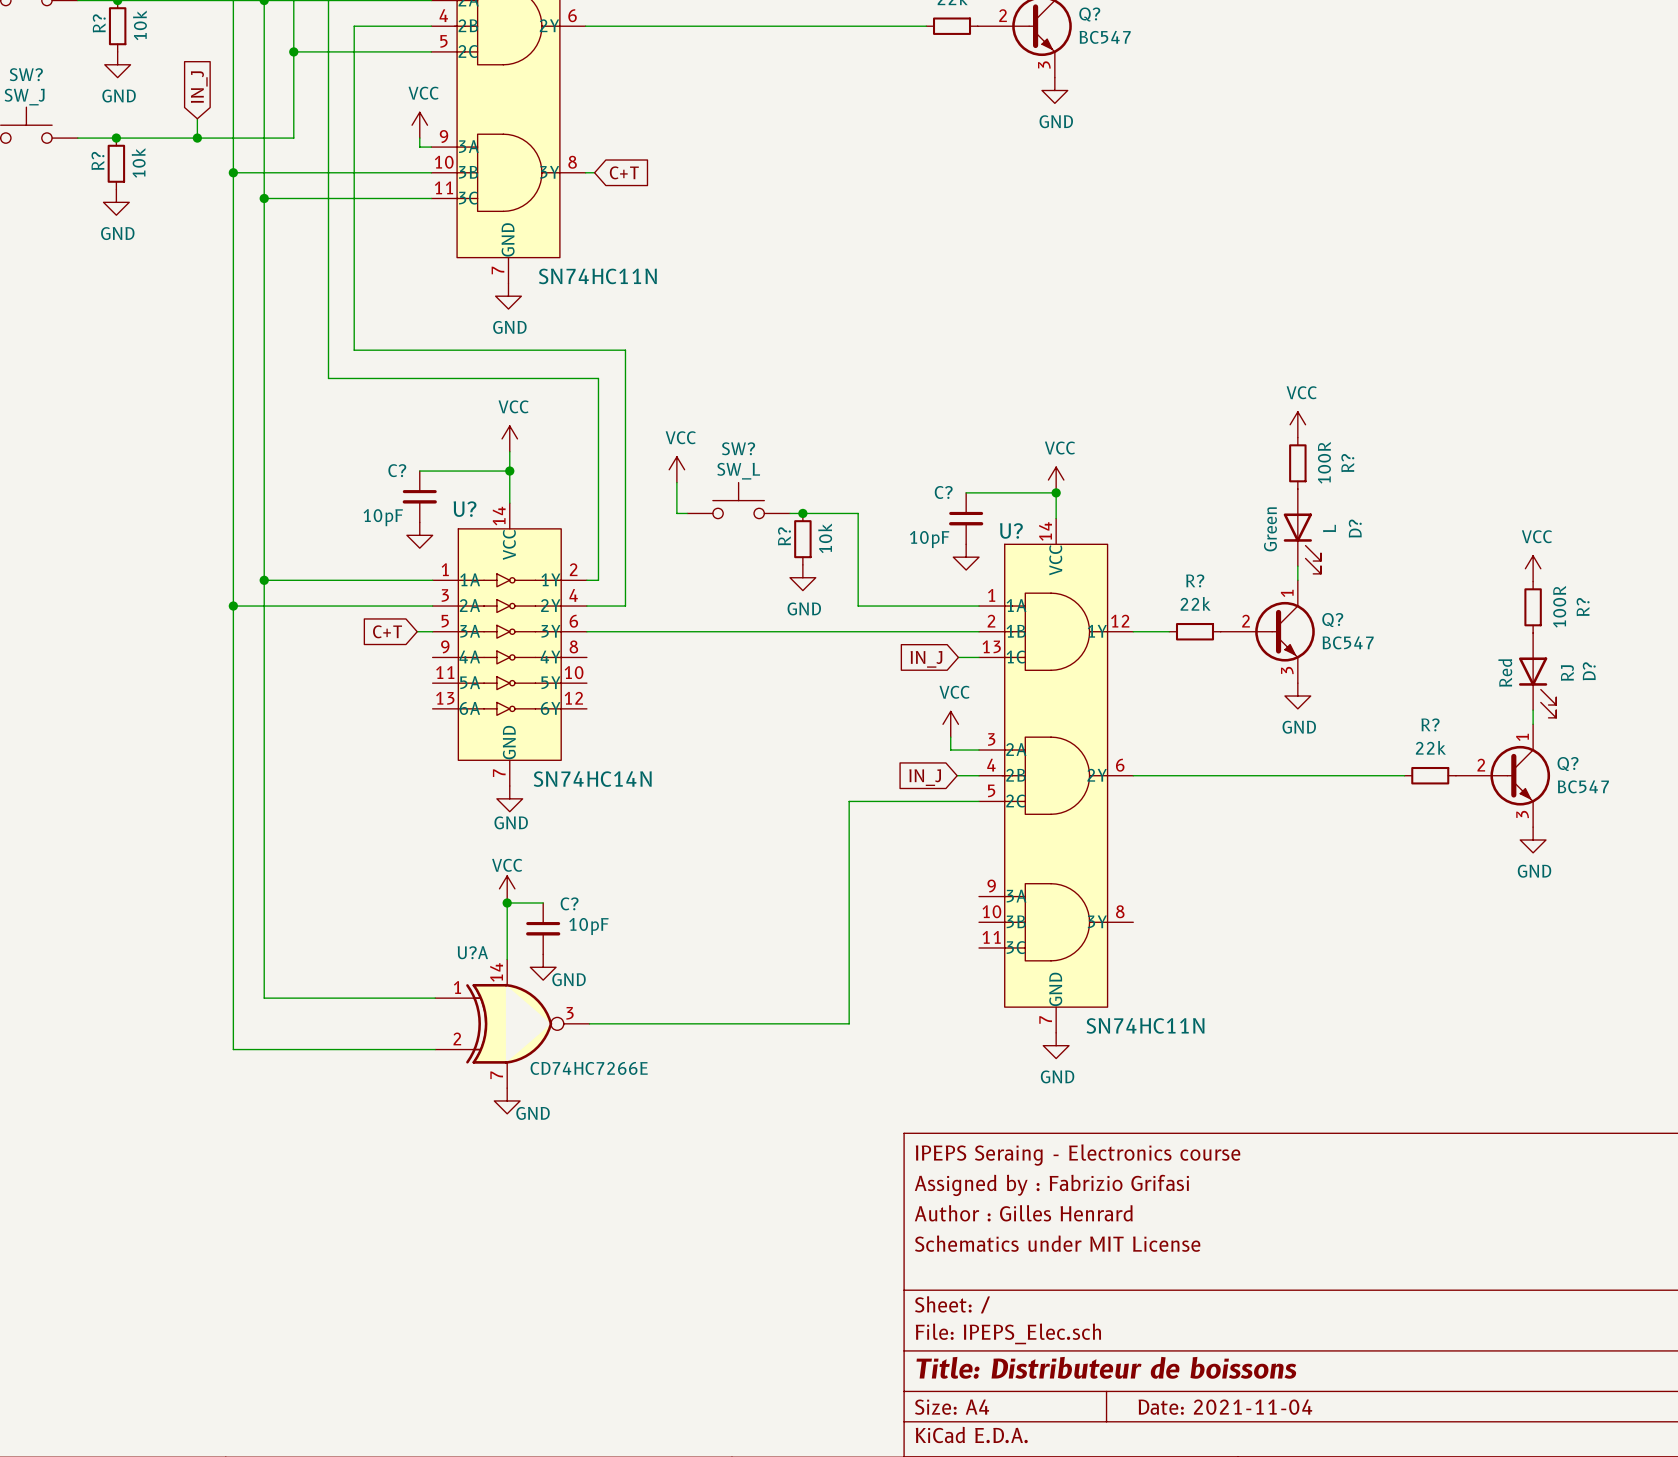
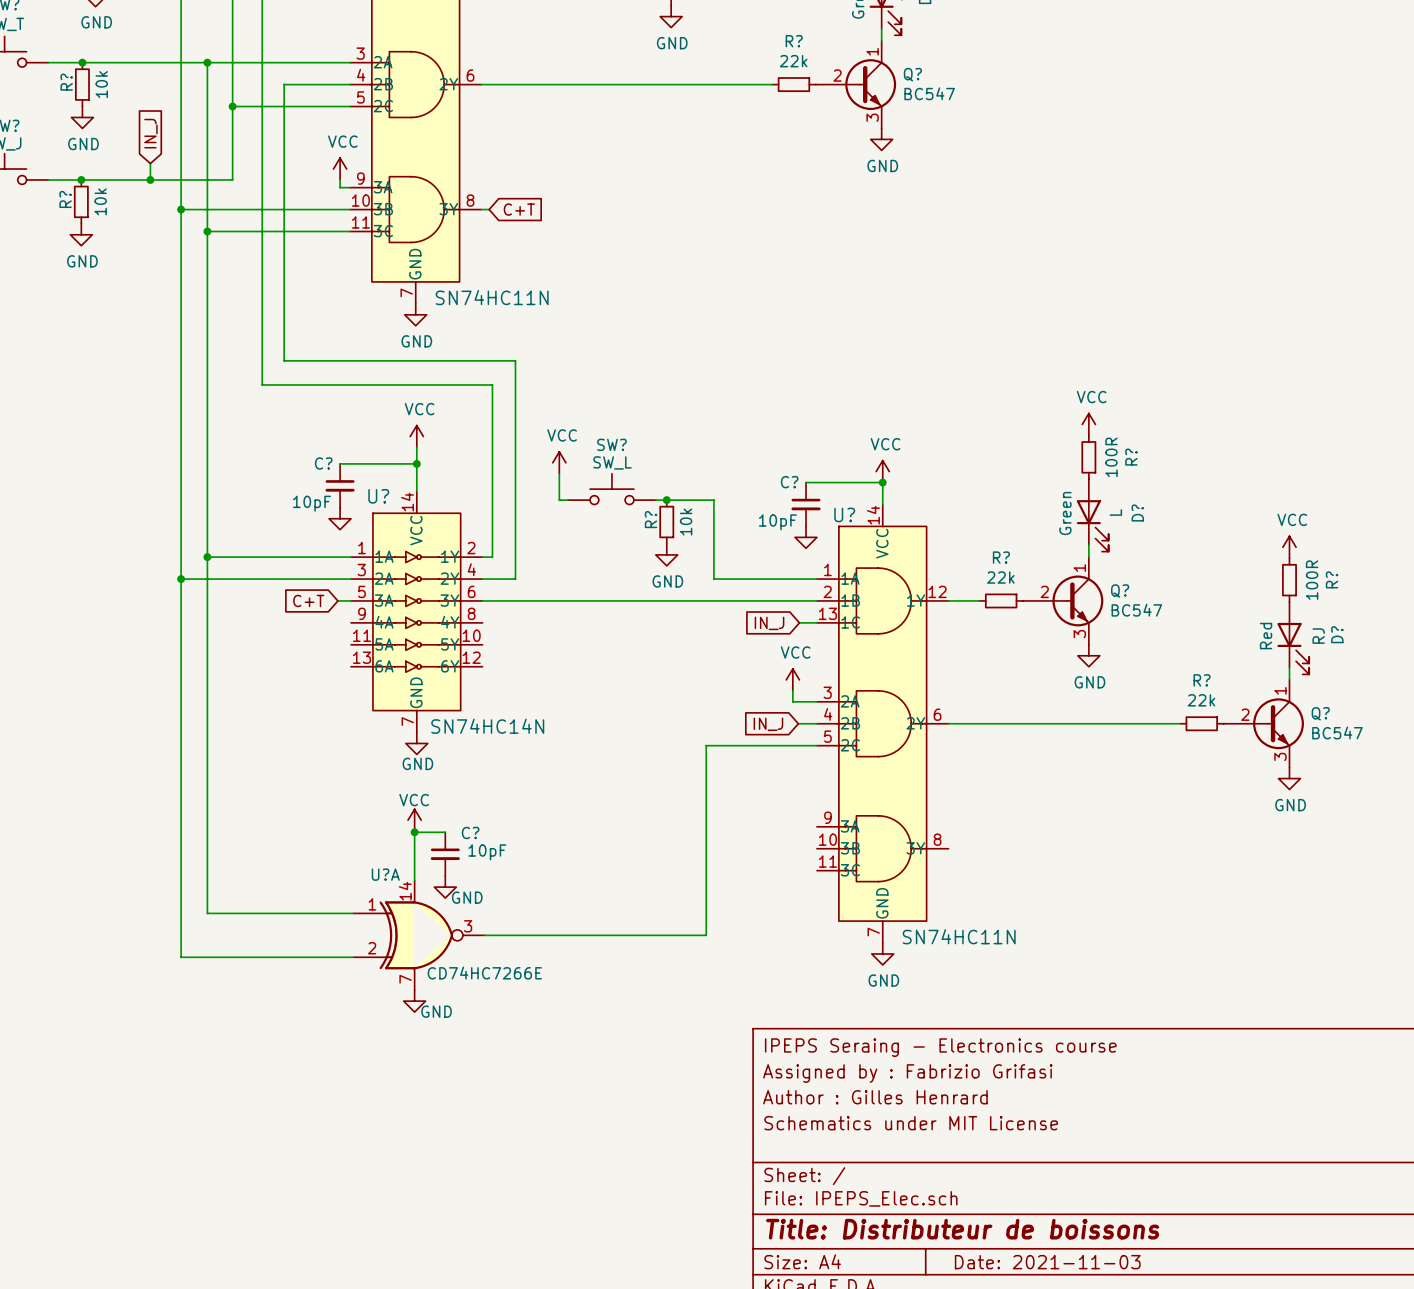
title block: Date: 2021-11-04 (1225, 1407) -> Date: 2021-11-03 (1047, 1262)

